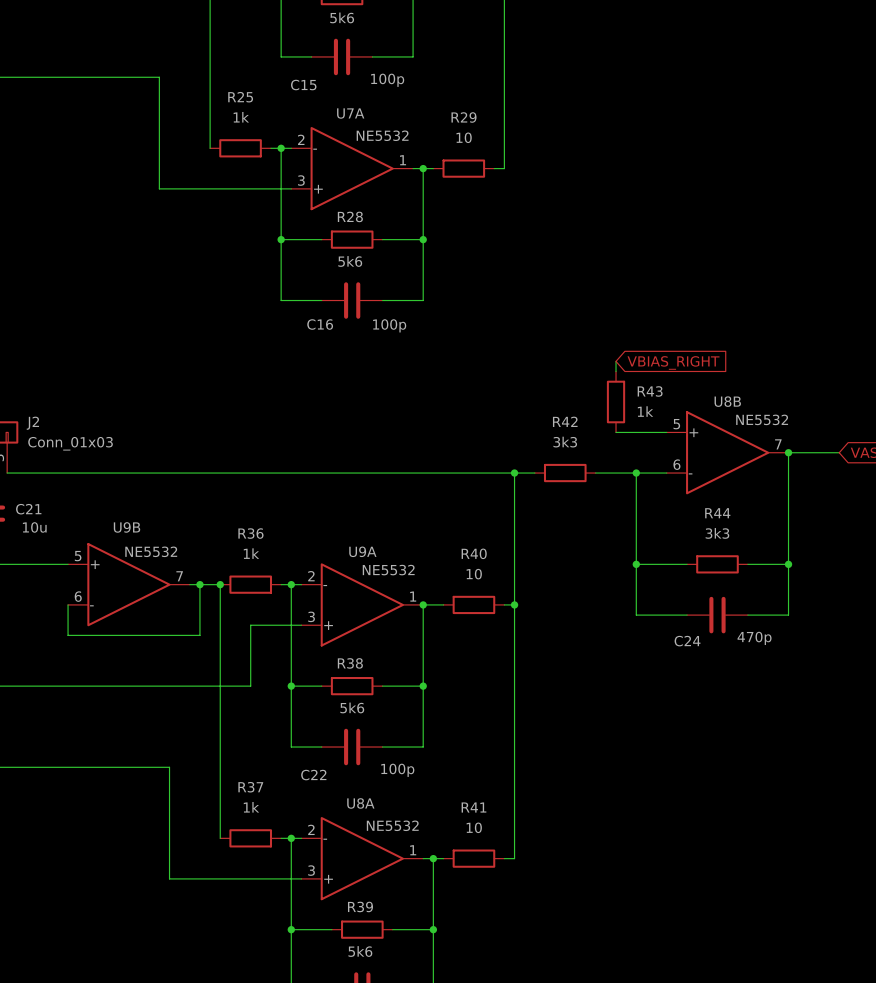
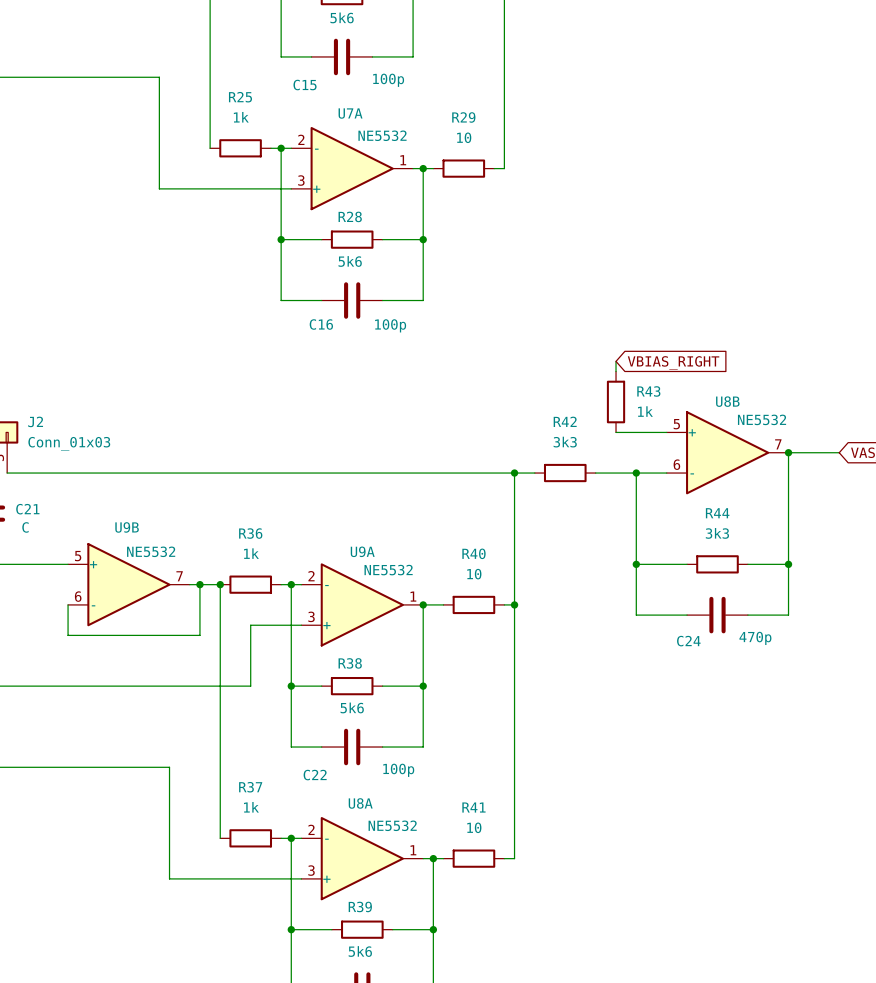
C21 value: 10u (34, 527) -> C (25, 527)

